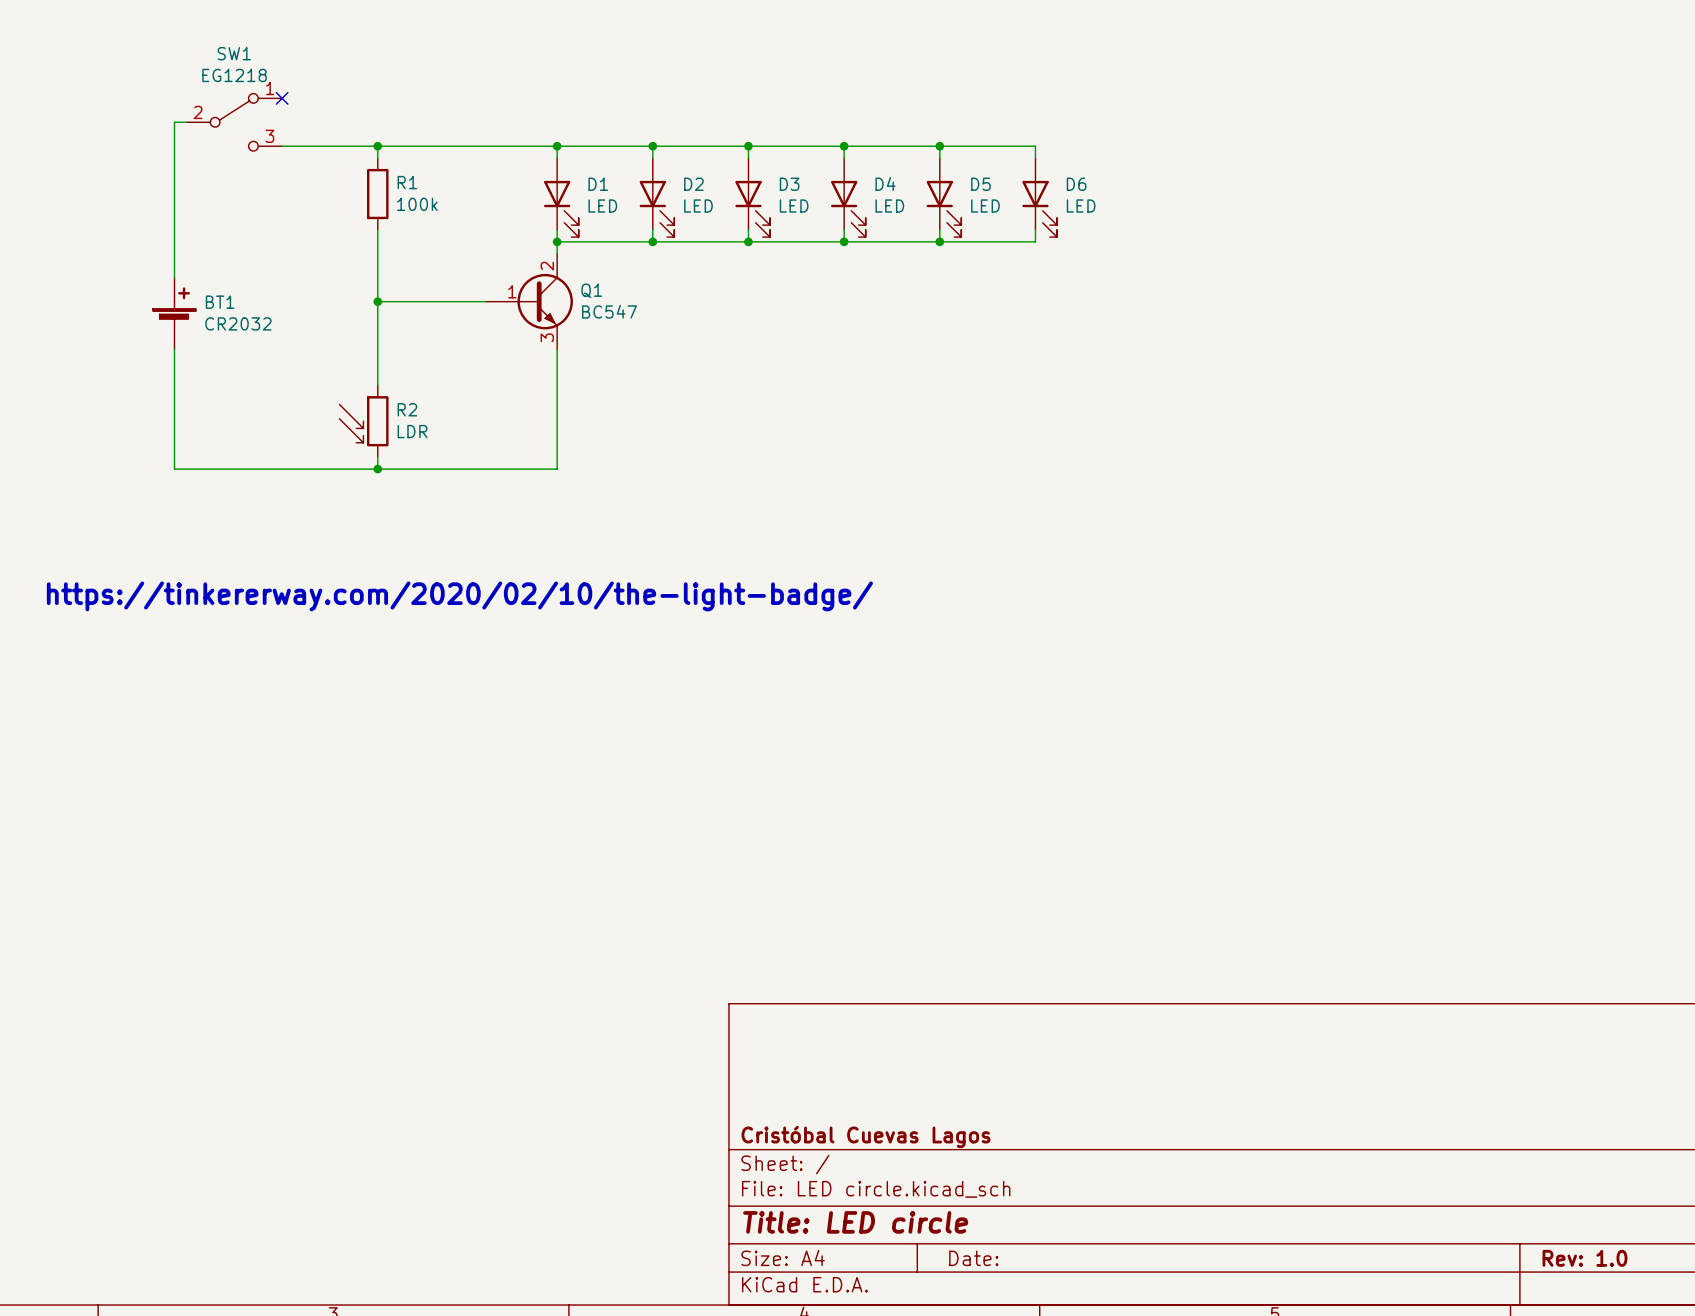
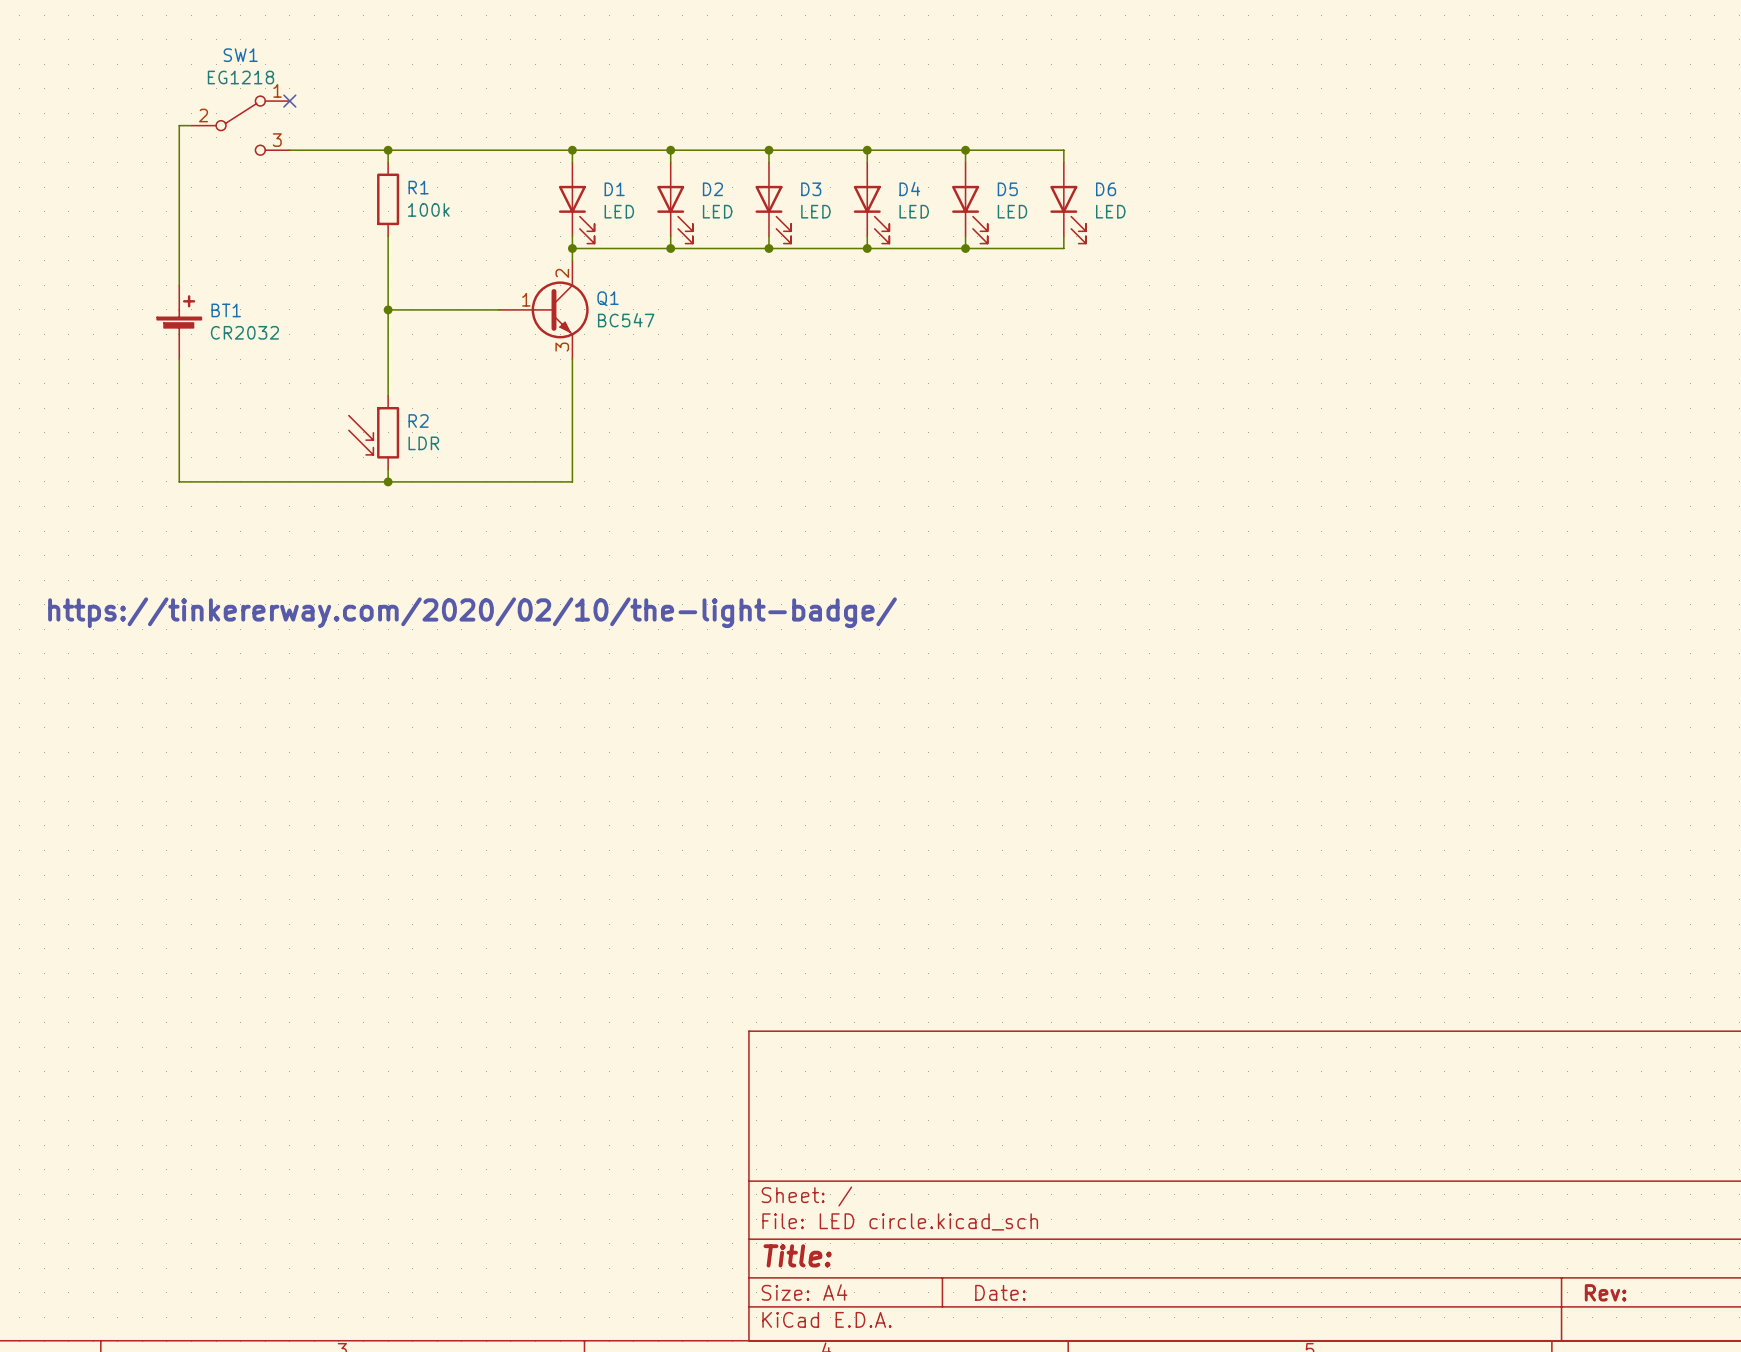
title block: Cristóbal Cuevas Lagos (866, 1137) -> none
title block: Title: LED circle (855, 1222) -> Title: (797, 1255)
title block: Rev: 1.0 (1584, 1258) -> Rev: (1605, 1292)

